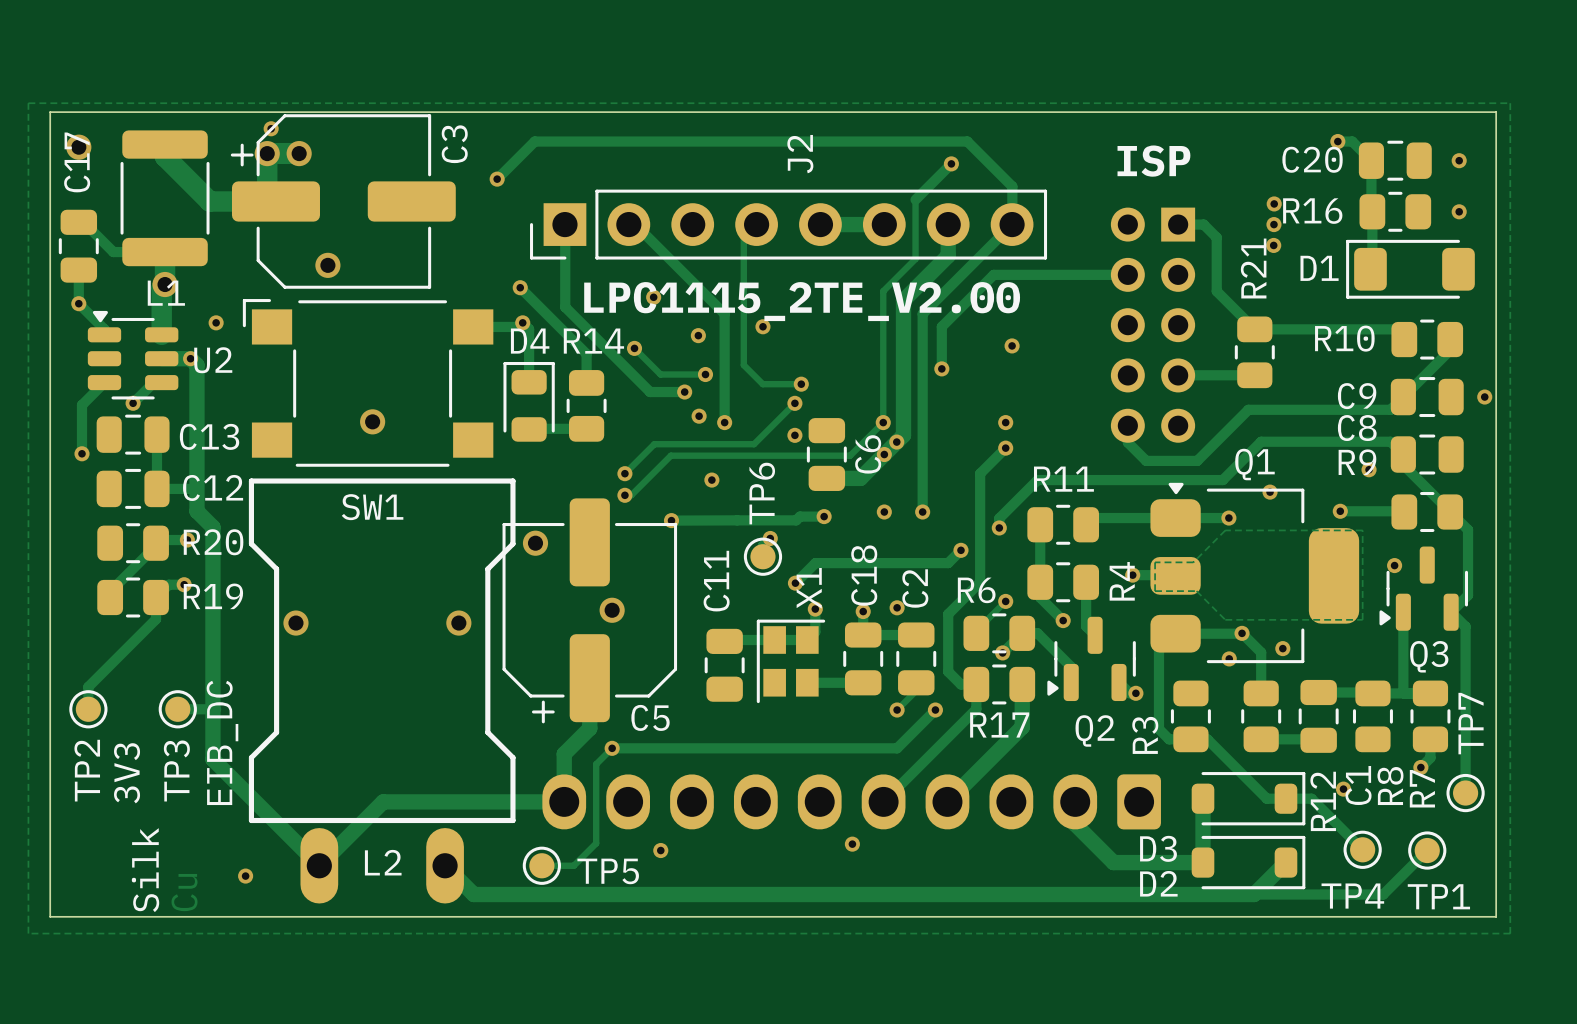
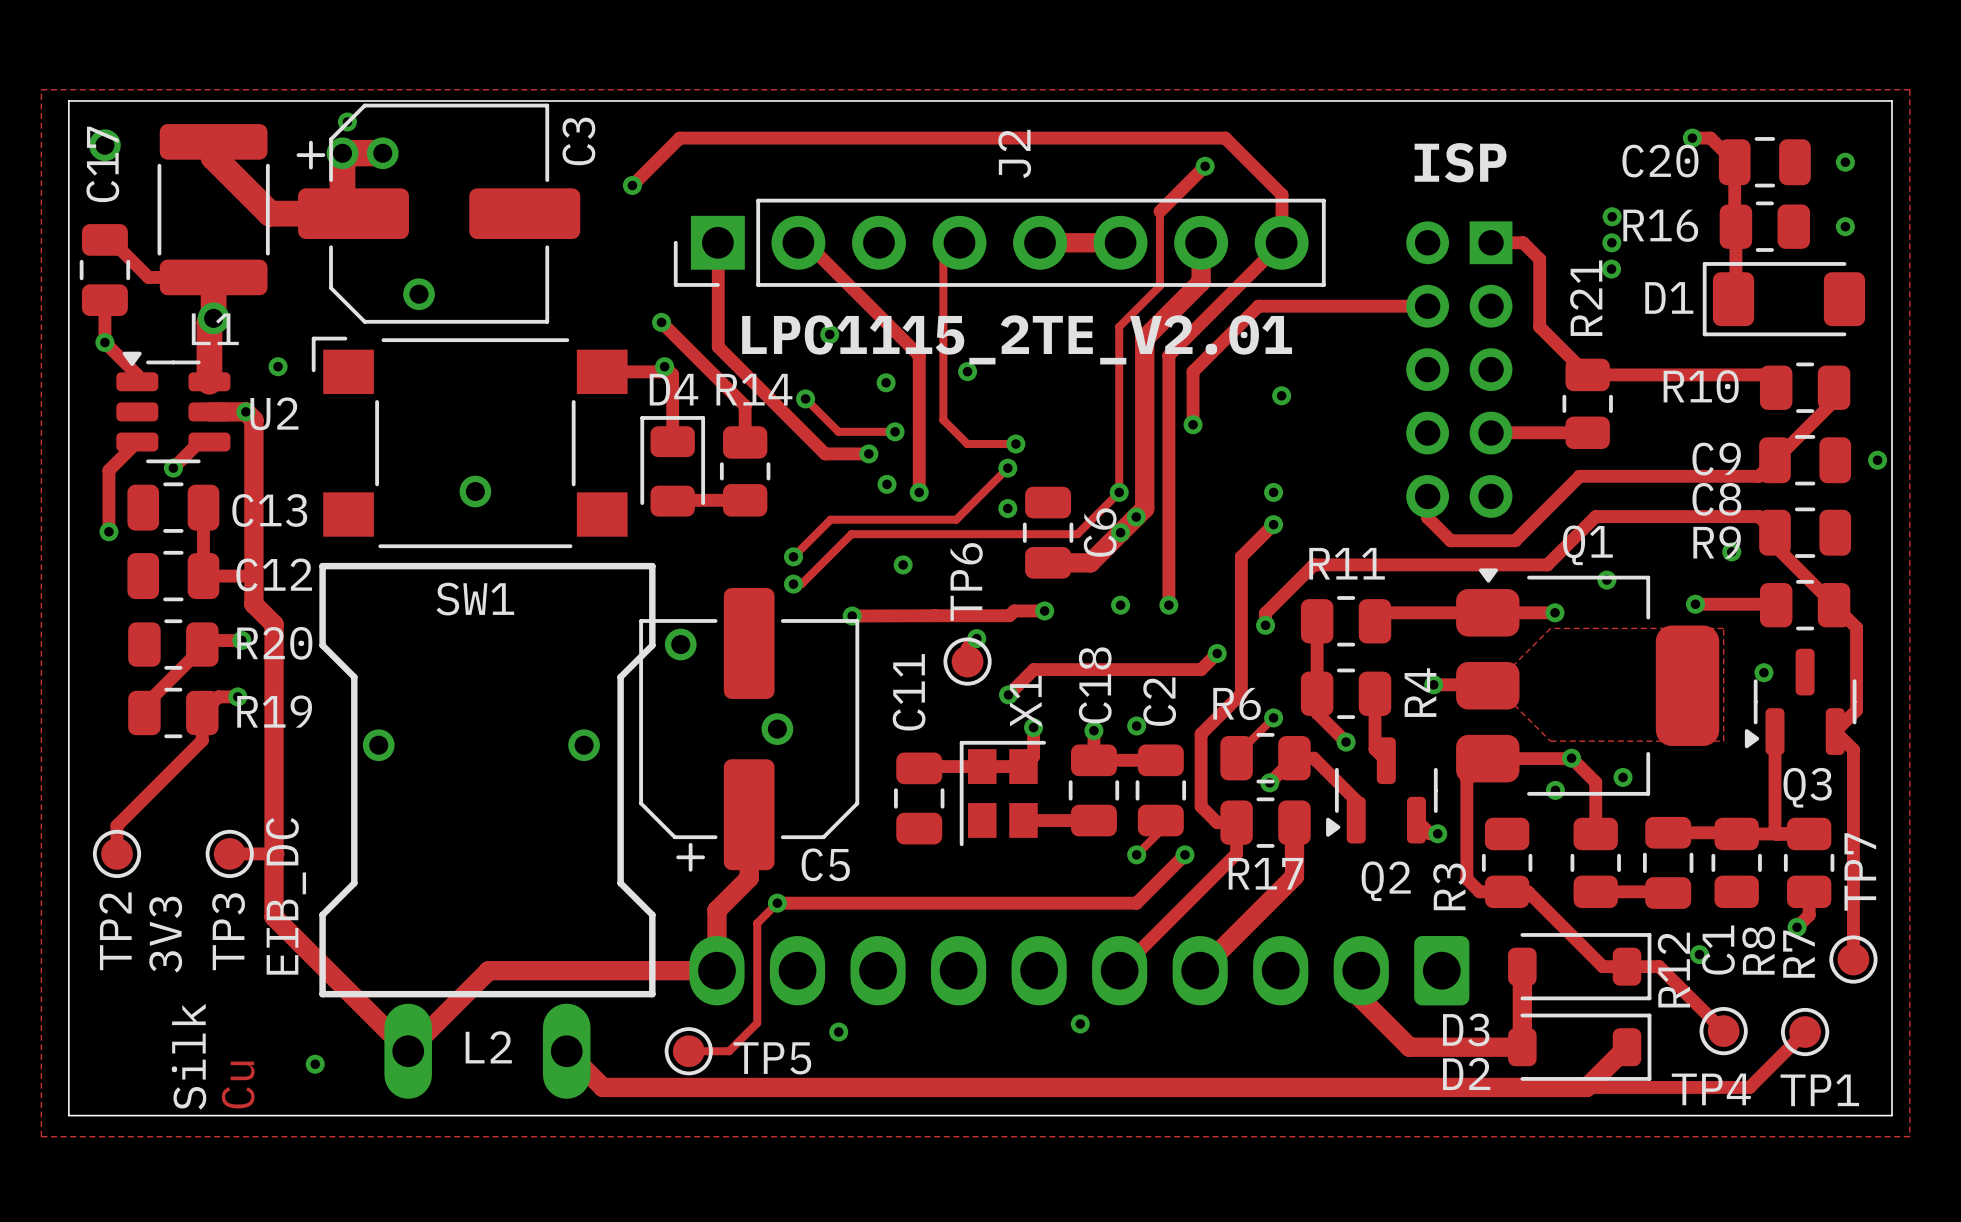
text: LPC1115_2TE_V2.00 (802, 301) -> LPC1115_2TE_V2.01 (1017, 339)

